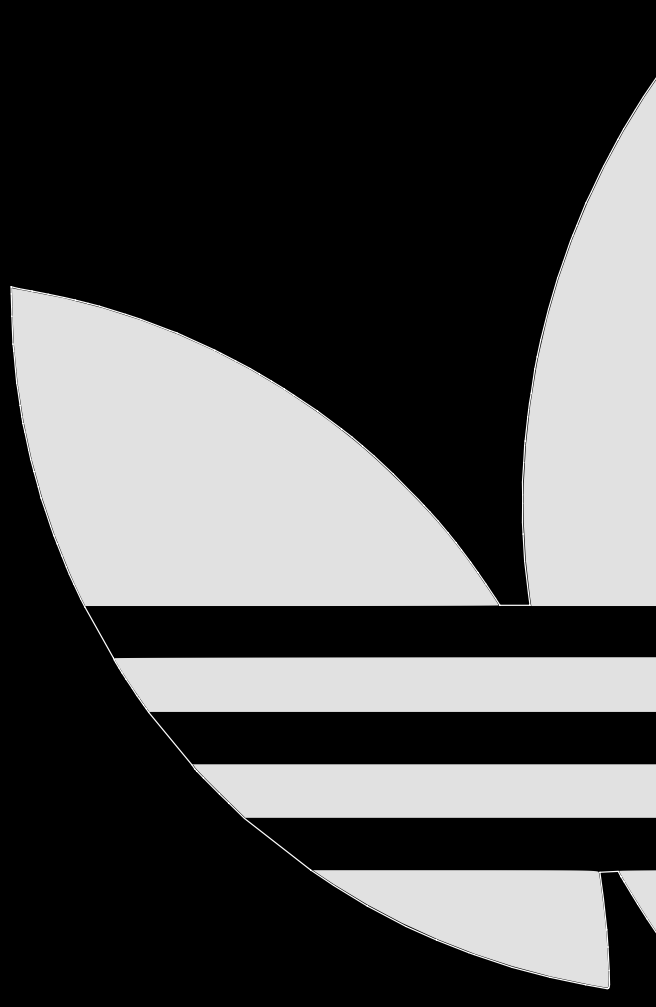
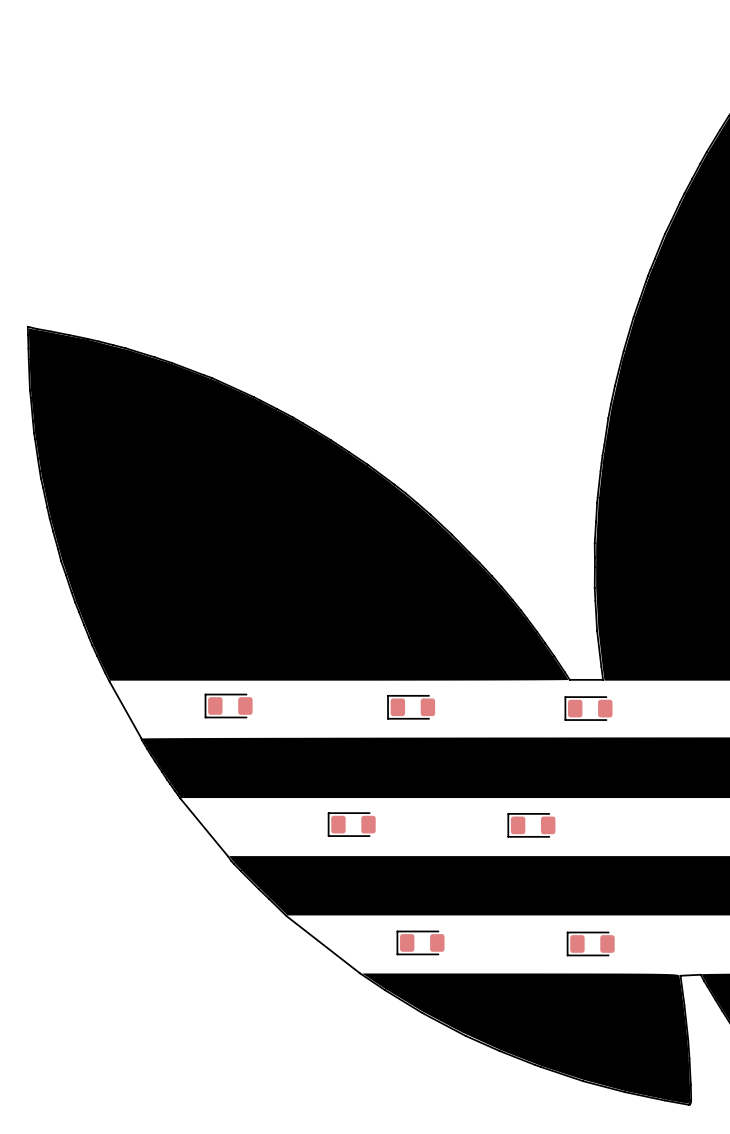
part: none -> (228, 706)
part: none -> (411, 707)
part: none -> (588, 708)
part: none -> (351, 824)
part: none -> (531, 825)
part: none -> (420, 942)
part: none -> (590, 943)

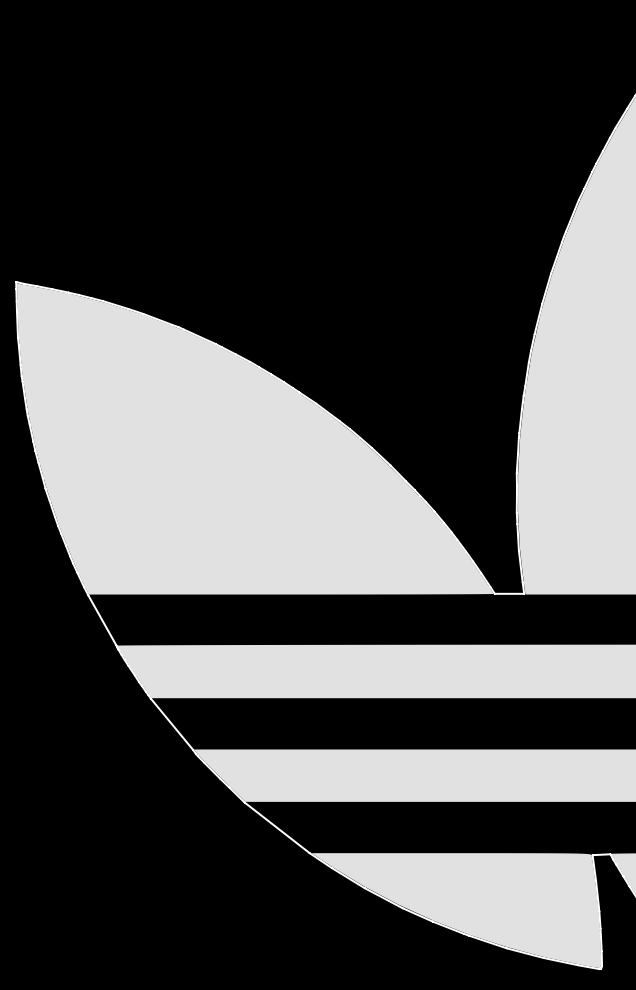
part: (228, 706) -> none
part: (411, 707) -> none
part: (588, 708) -> none
part: (351, 824) -> none
part: (531, 825) -> none
part: (420, 942) -> none
part: (590, 943) -> none

